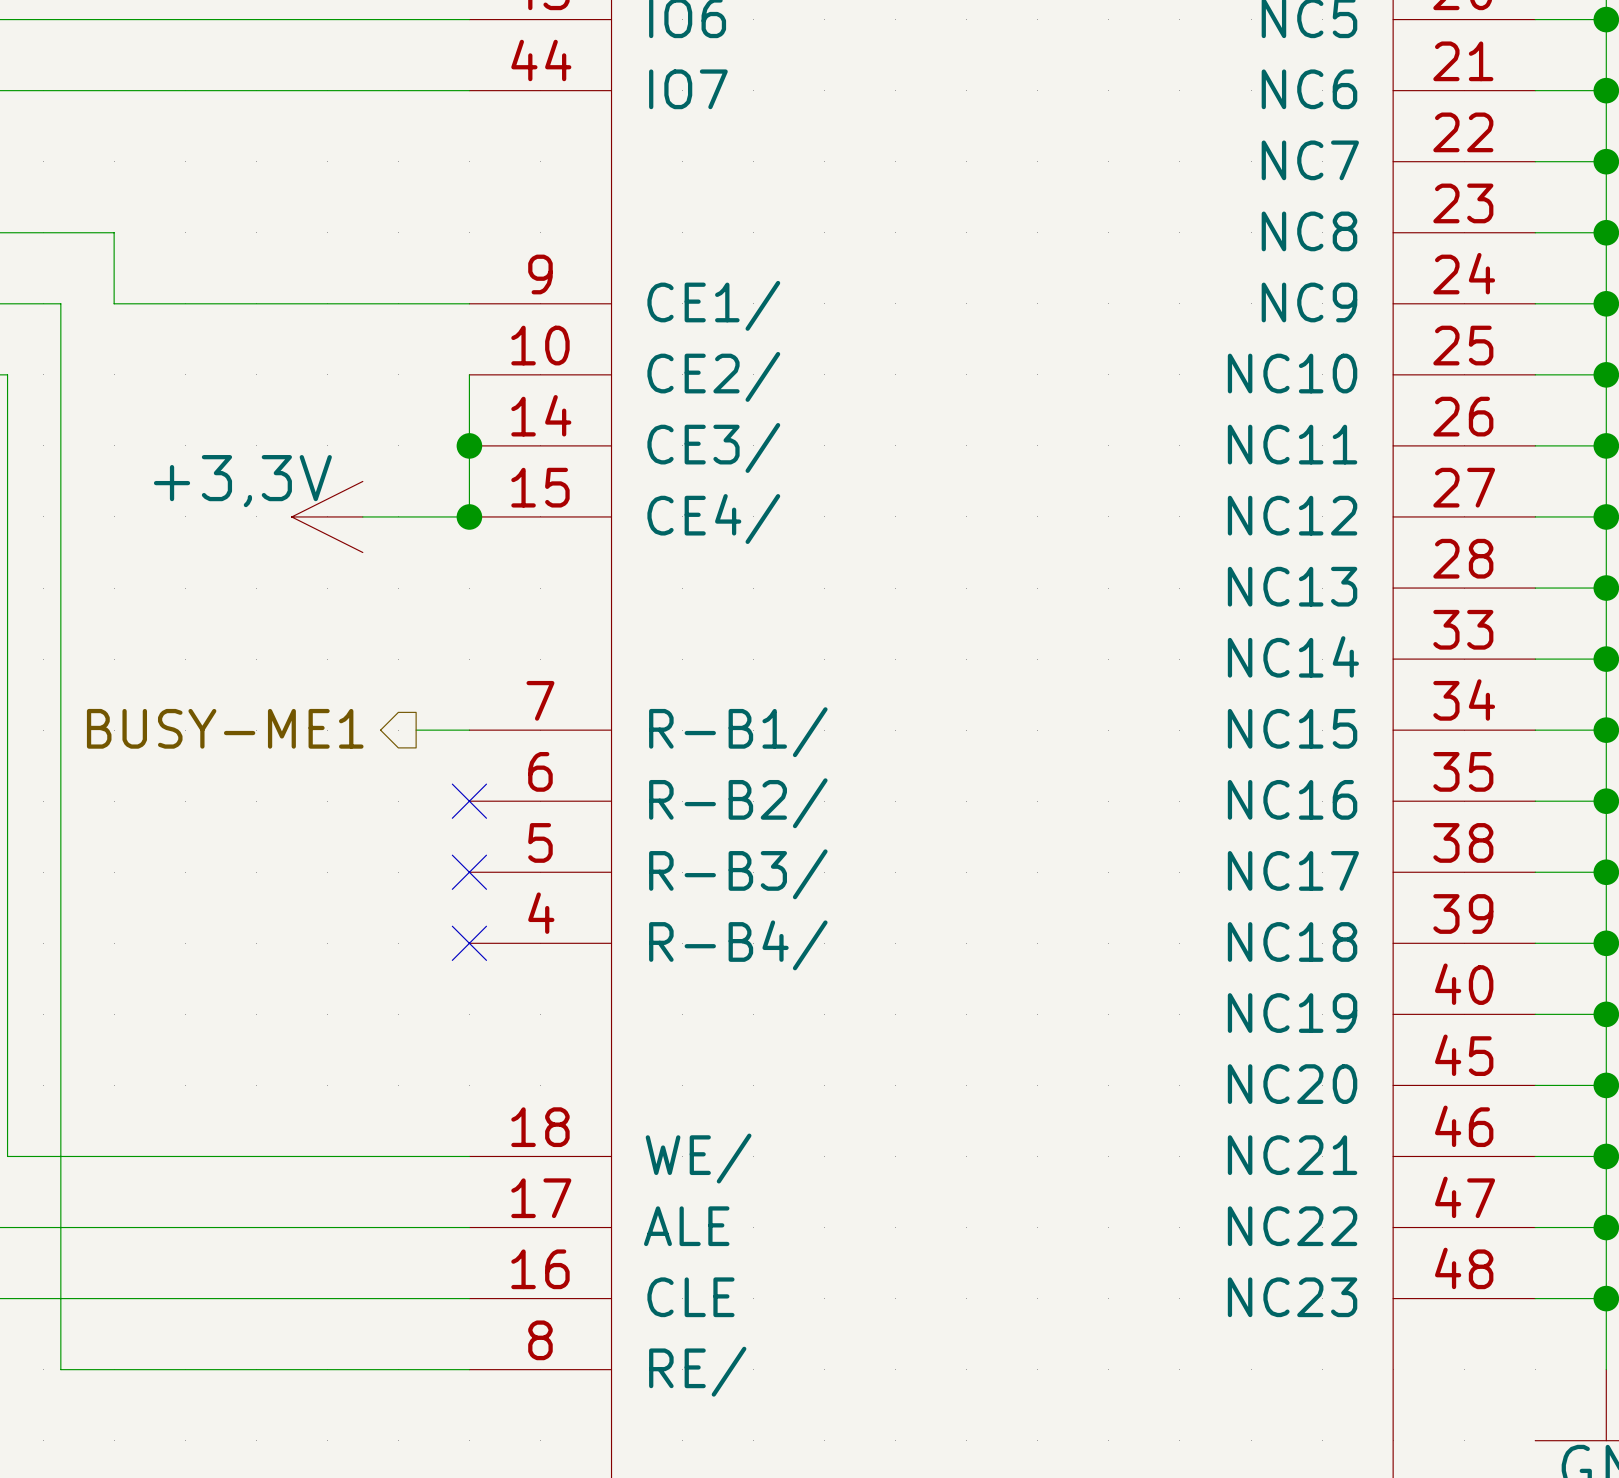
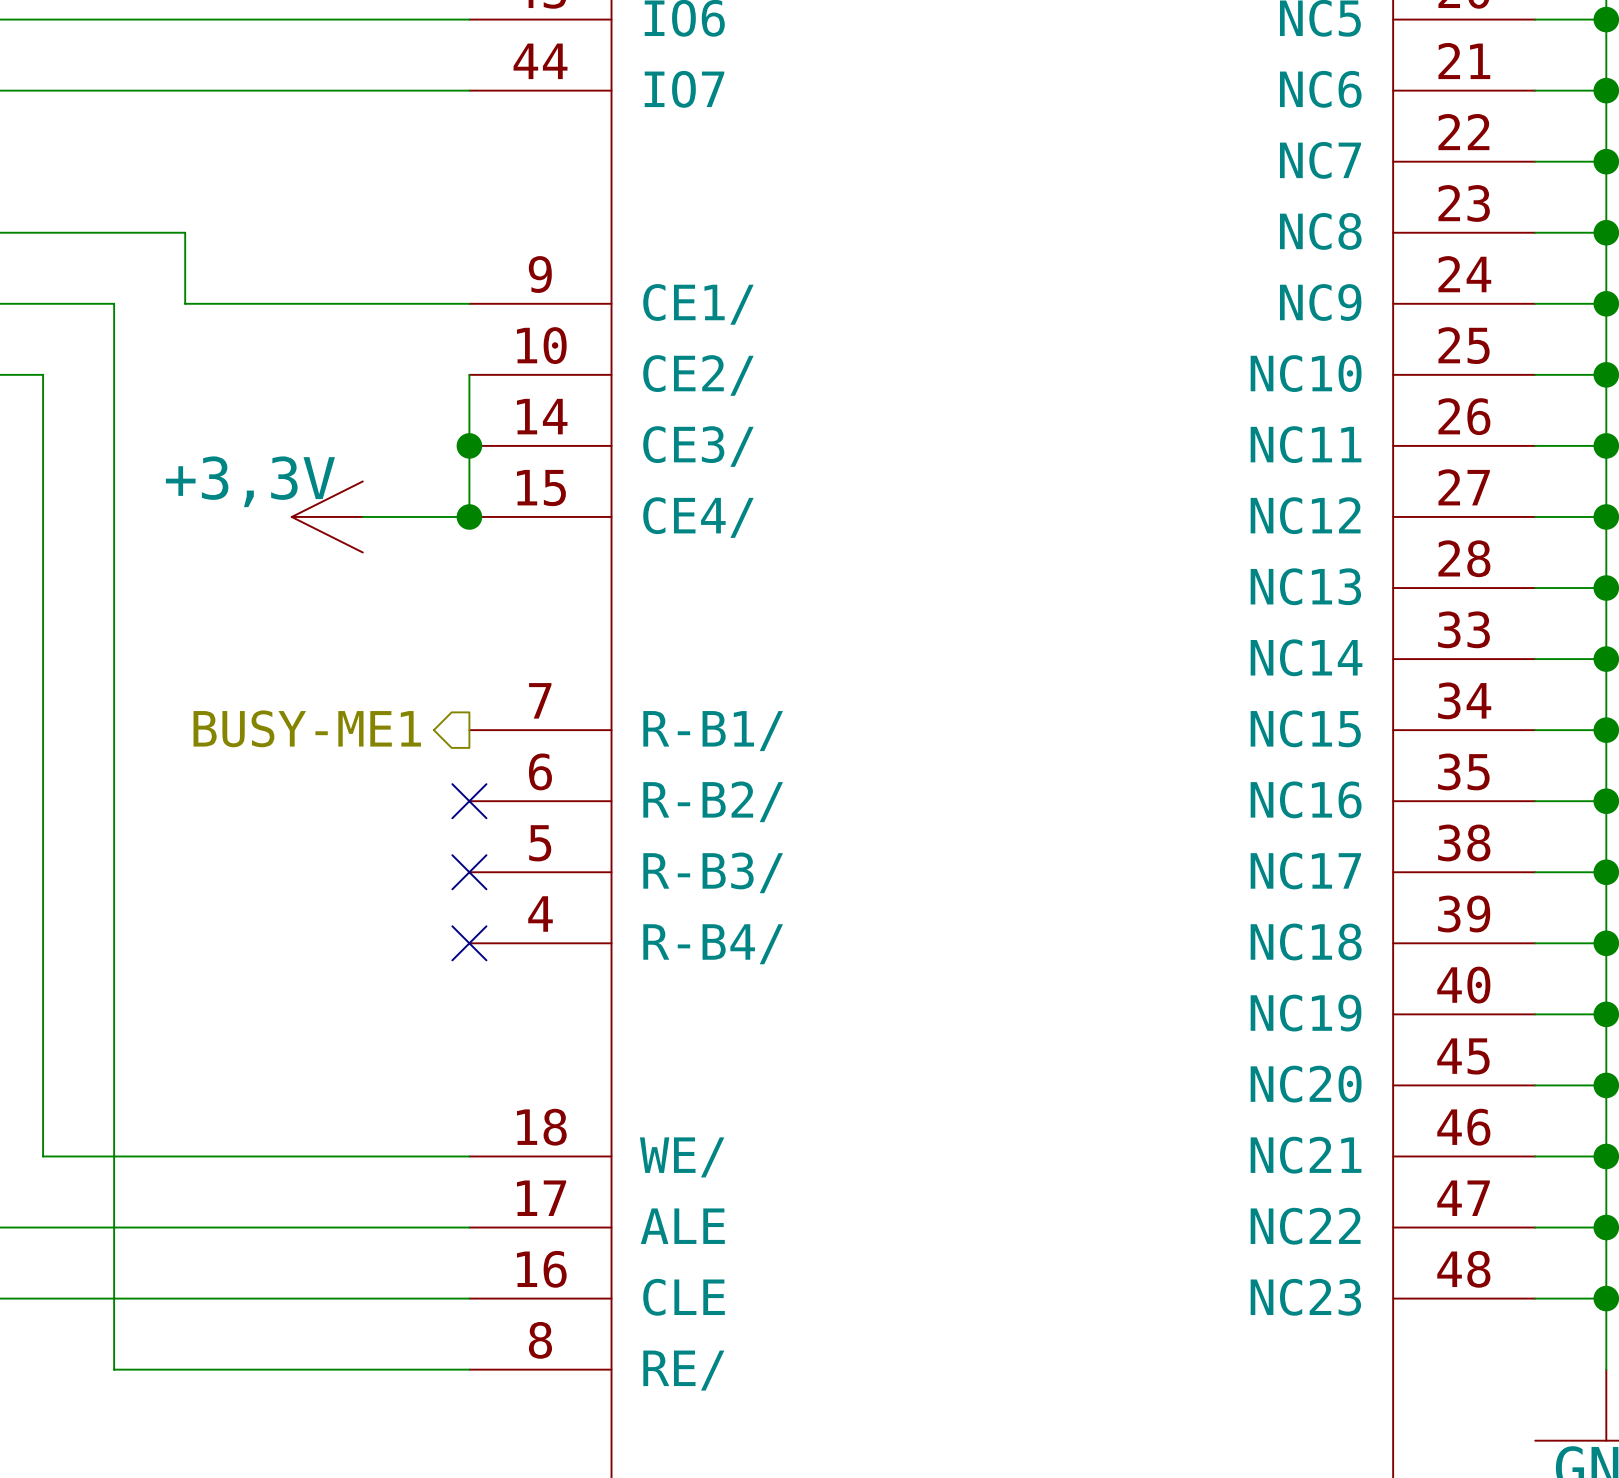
wire: (114, 232) (114, 303) (185, 303) -> (114, 232) (185, 232) (185, 303)
wire: (60, 303) (60, 1369) (114, 1369) -> (60, 303) (114, 303) (114, 1369)
wire: (7, 374) (7, 1156) (43, 1156) -> (7, 374) (43, 374) (43, 1156)
hierarchical label position: BUSY-ME1 (225, 728) -> BUSY-ME1 (307, 728)
wire: (416, 730) (469, 730) -> none

